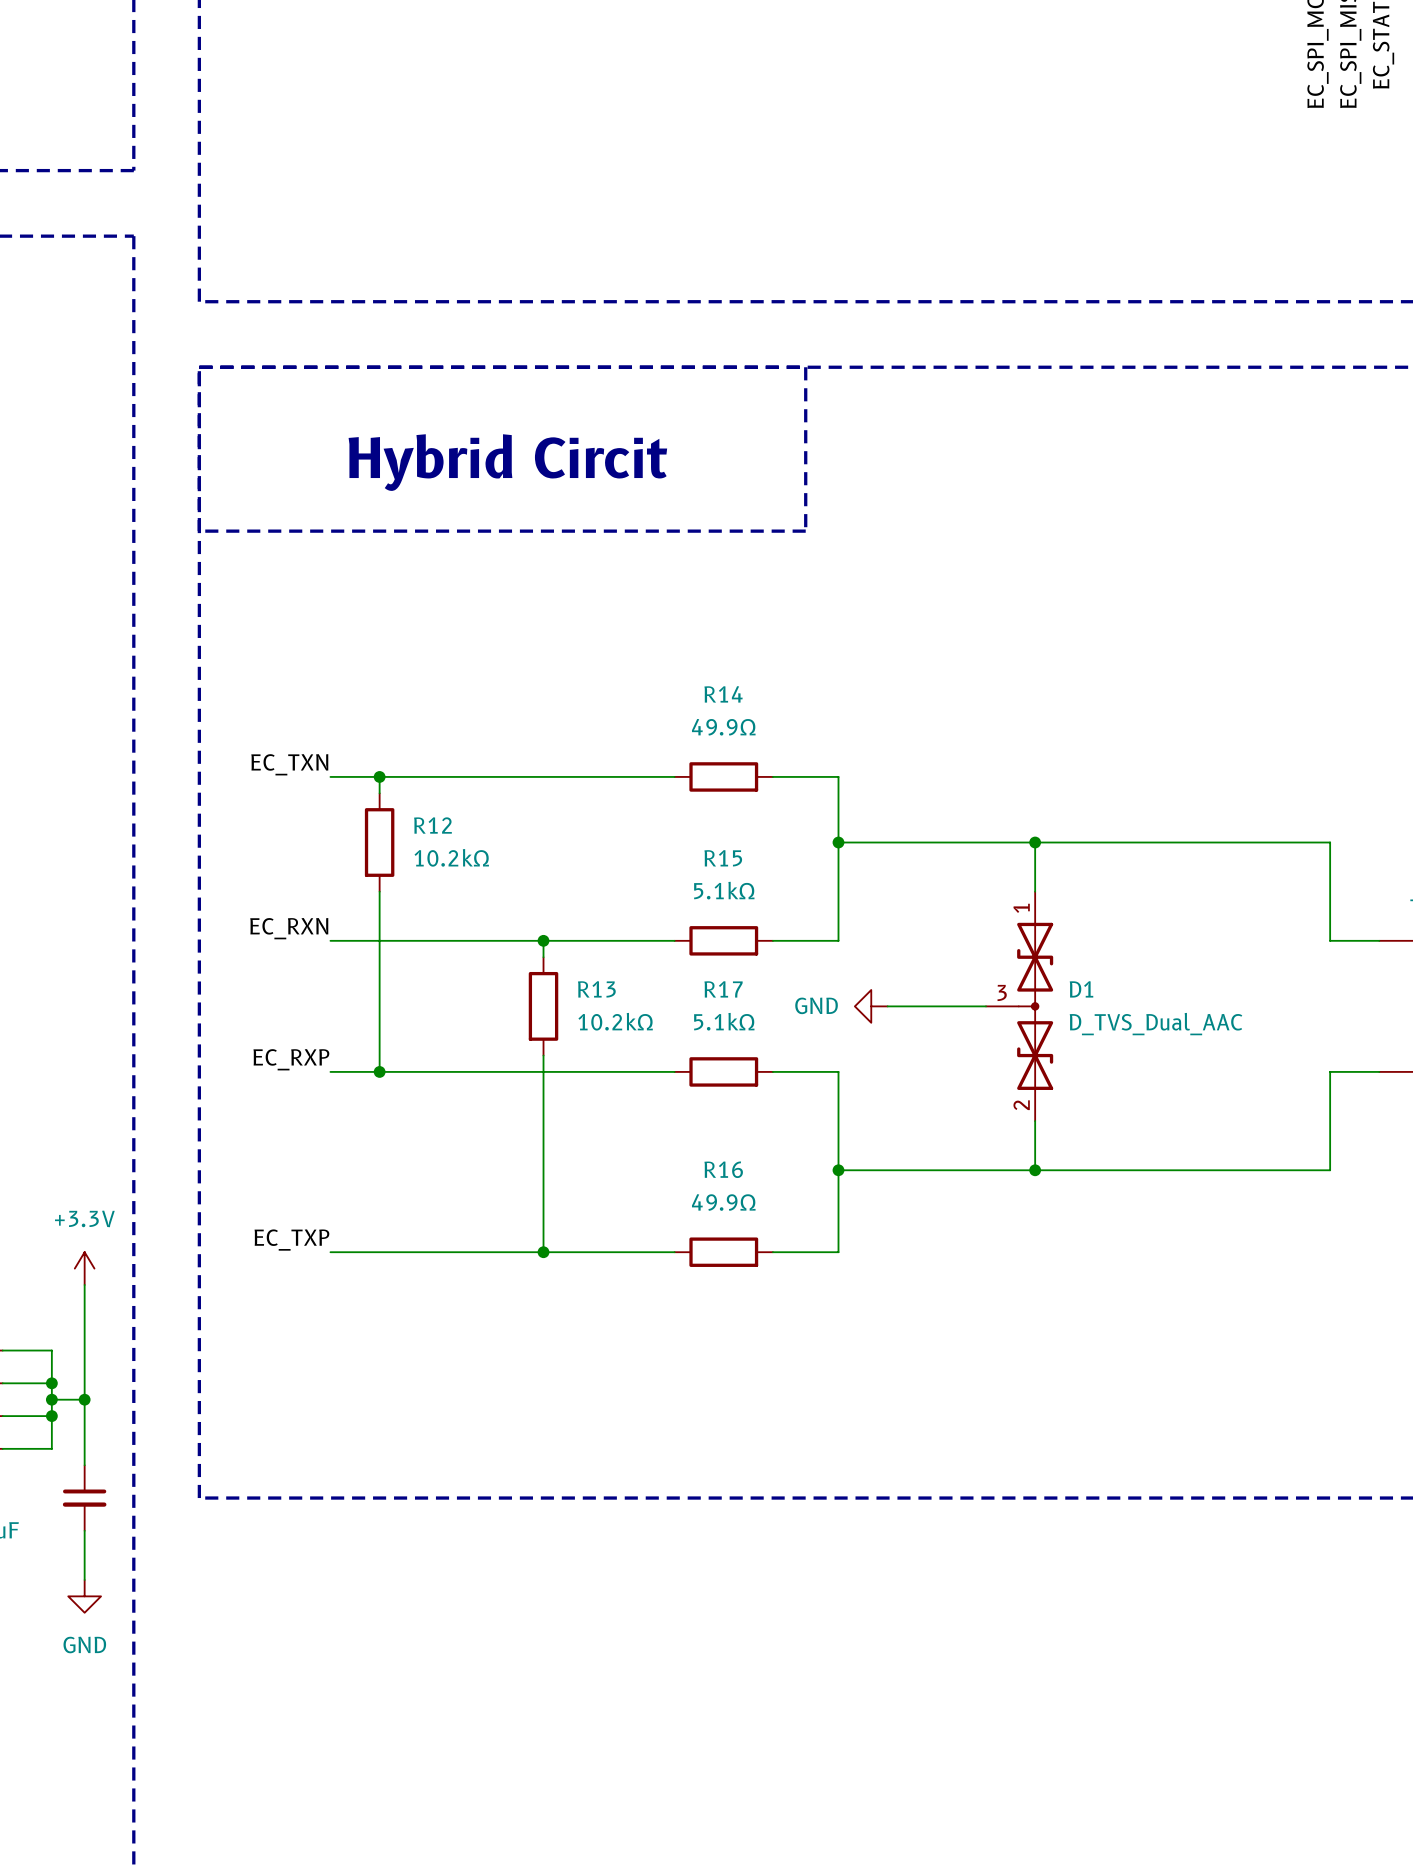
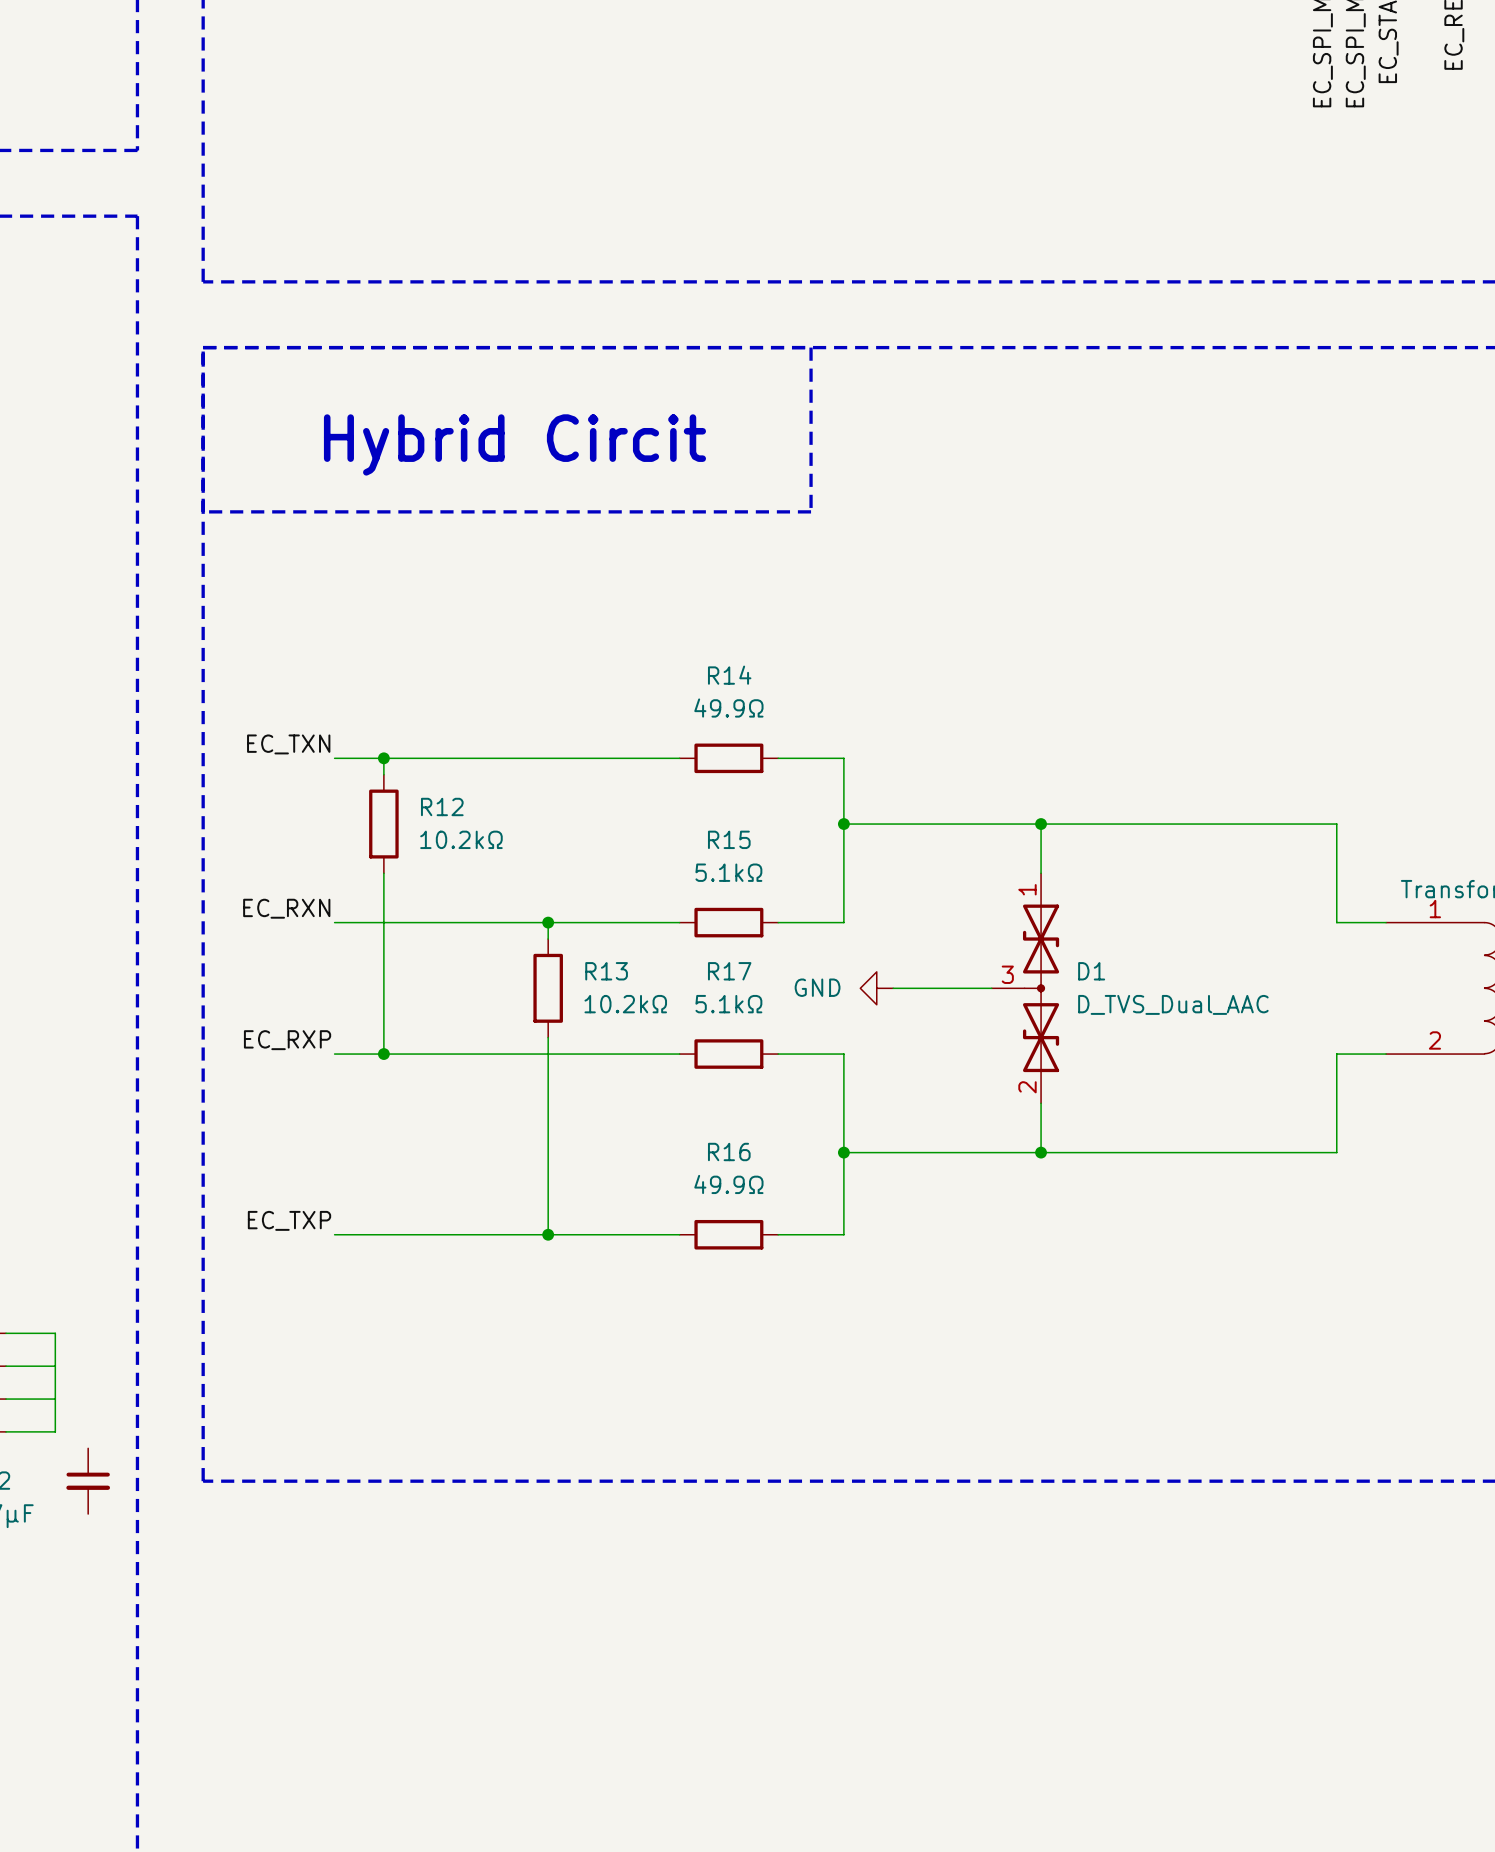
power symbol: +3.3V (84, 1268) -> none
wire: (84, 1284) (84, 1465) -> none
junction: (51, 1383) -> none
wire: (51, 1399) (84, 1399) -> none
junction: (51, 1399) -> none
junction: (84, 1399) -> none
junction: (51, 1416) -> none
wire: (84, 1530) (84, 1579) -> none
power symbol: GND (84, 1596) -> none

